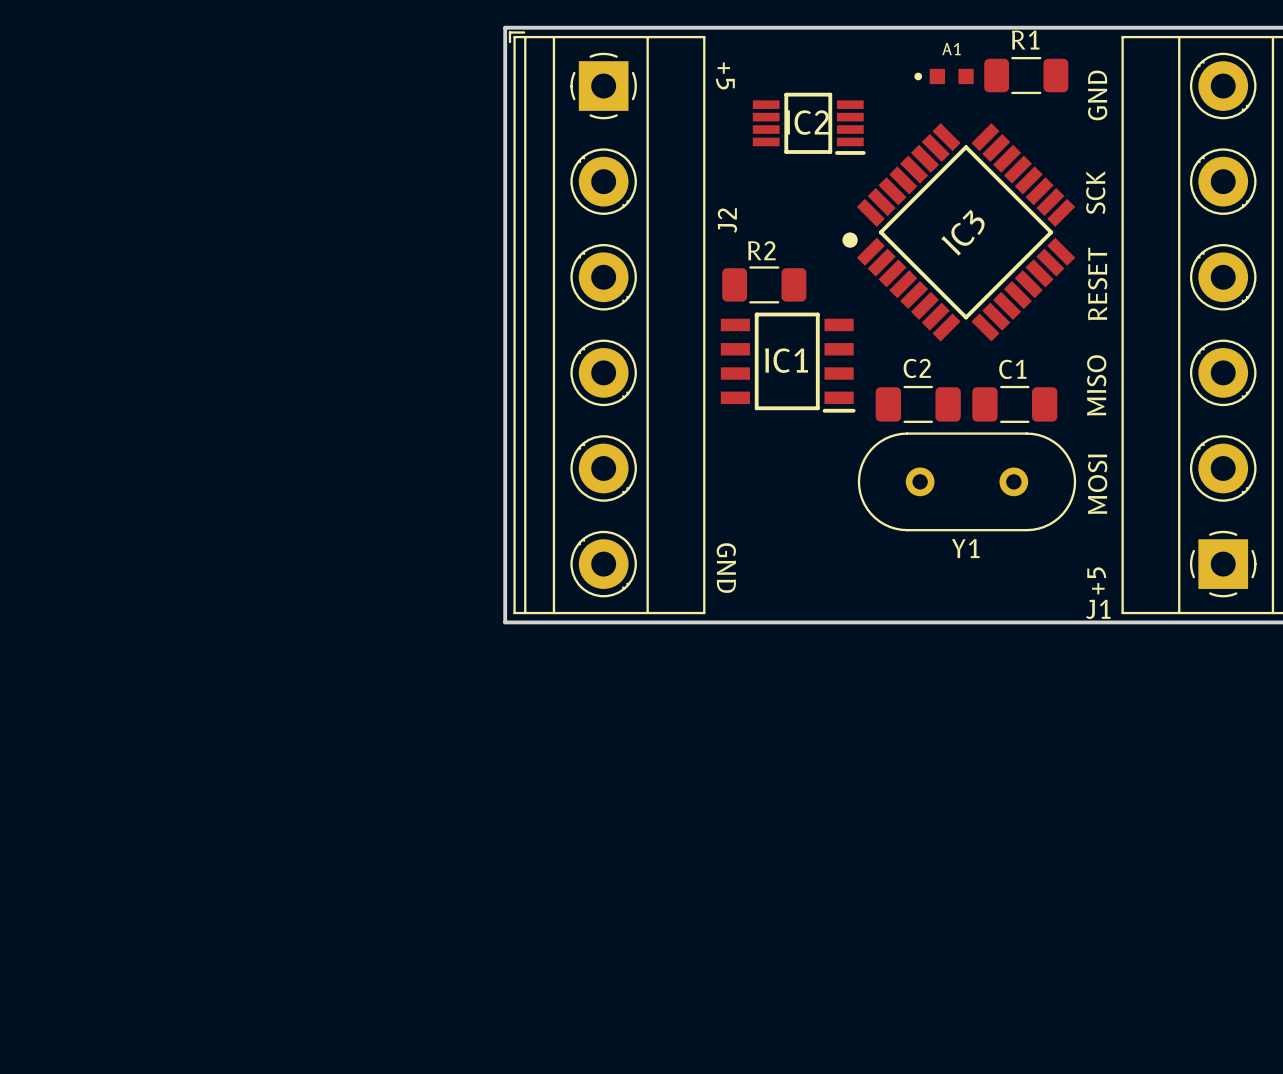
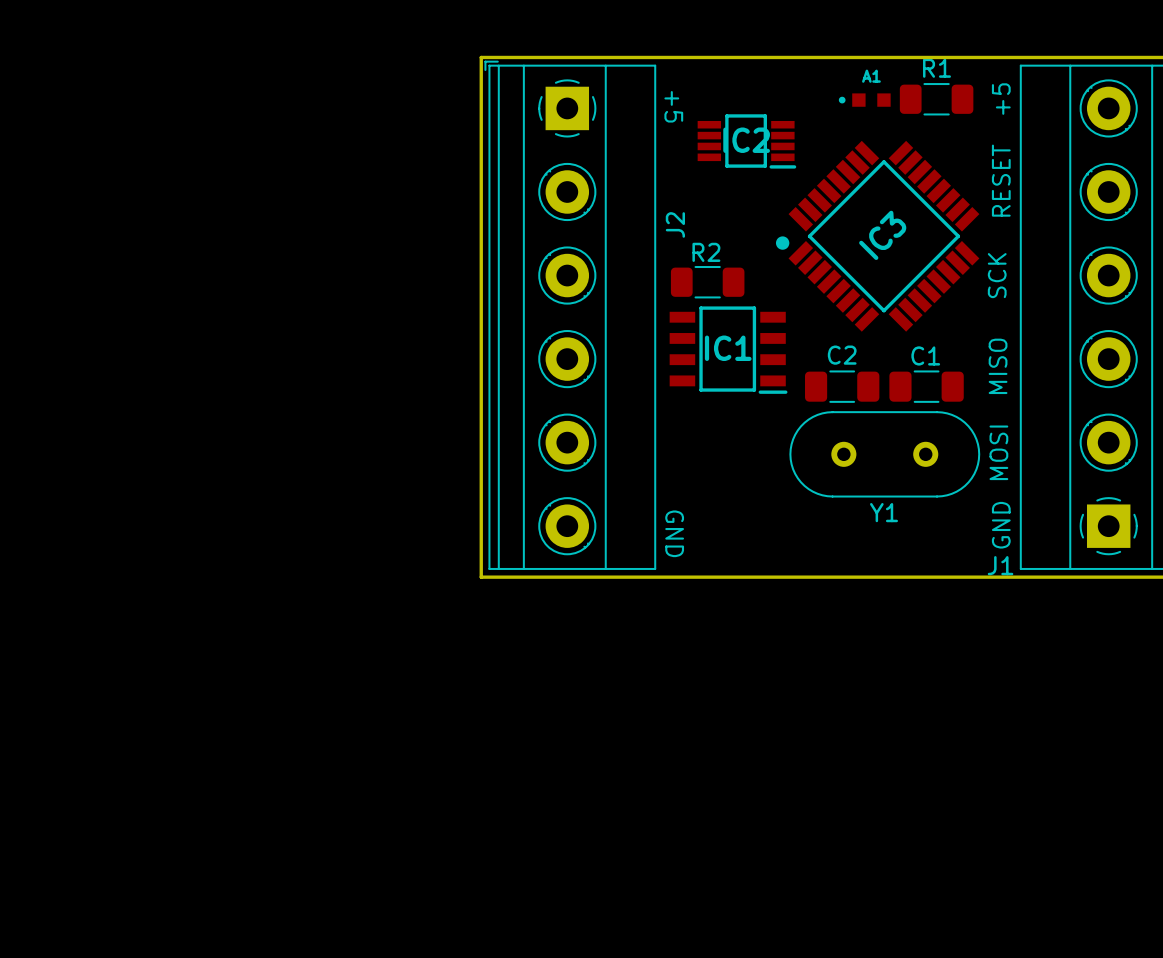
text: none -> +5 (1001, 99)
text: GND (1097, 95) -> none
text: SCK (1095, 192) -> RESET (1001, 180)
text: RESET (1097, 284) -> SCK (997, 275)
text: +5 (1096, 580) -> GND (1001, 525)

